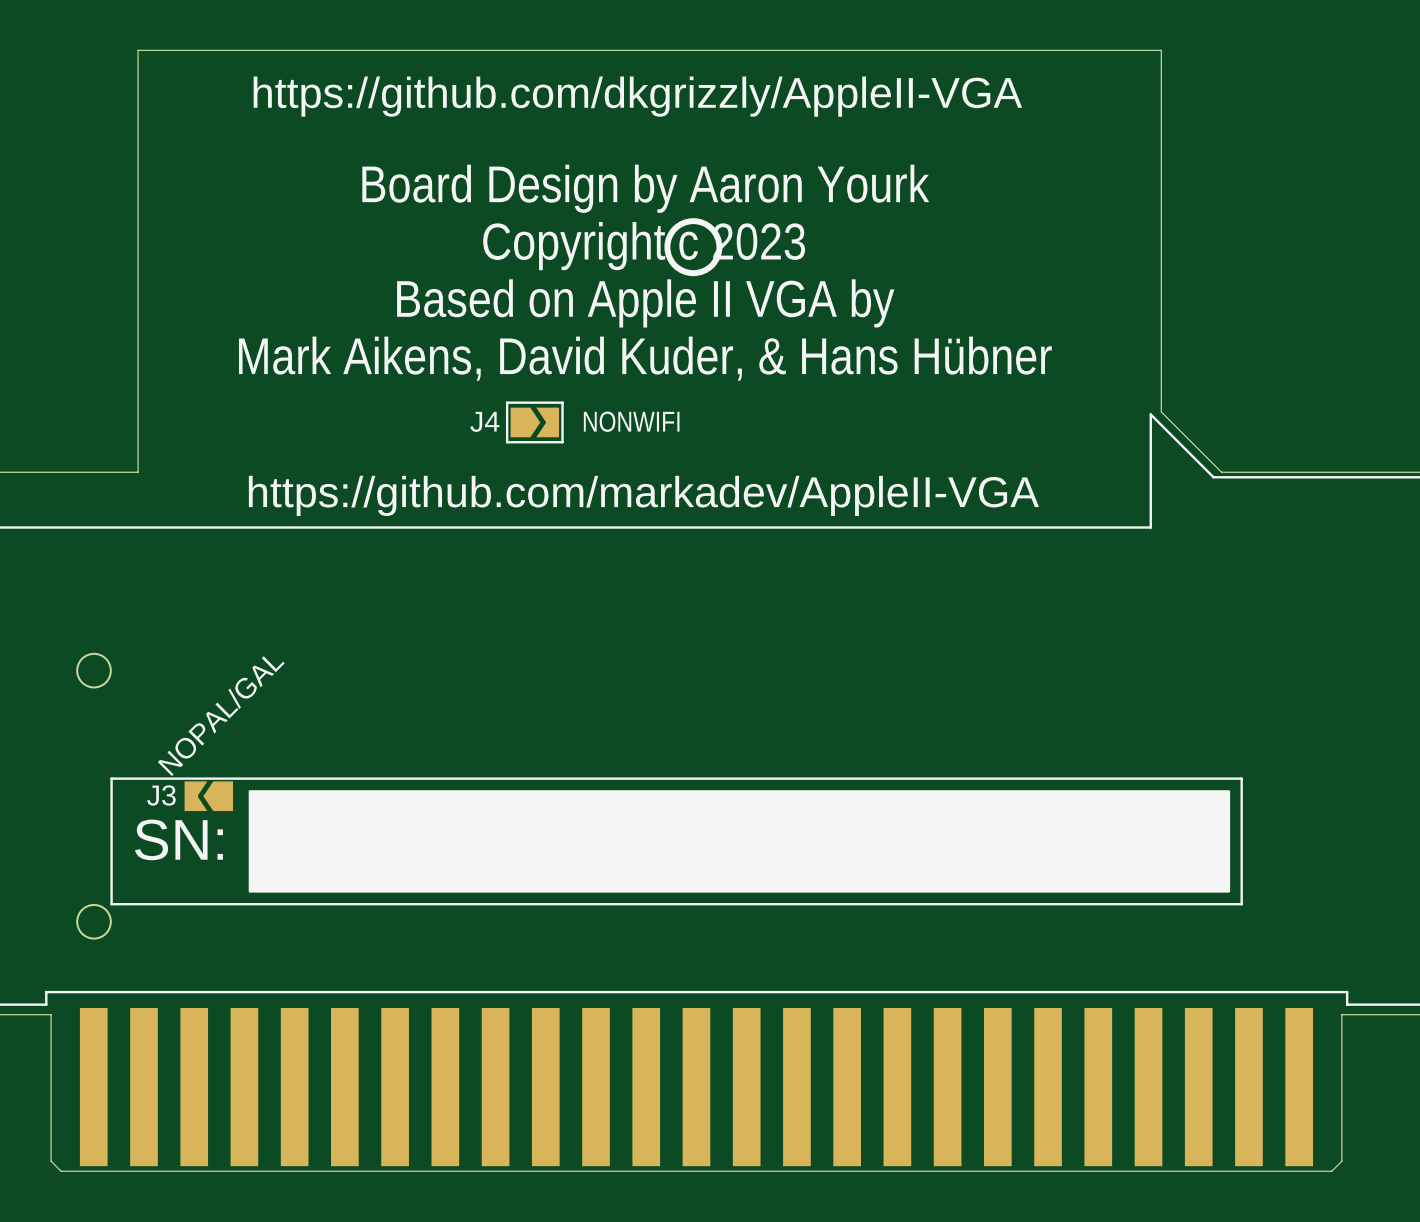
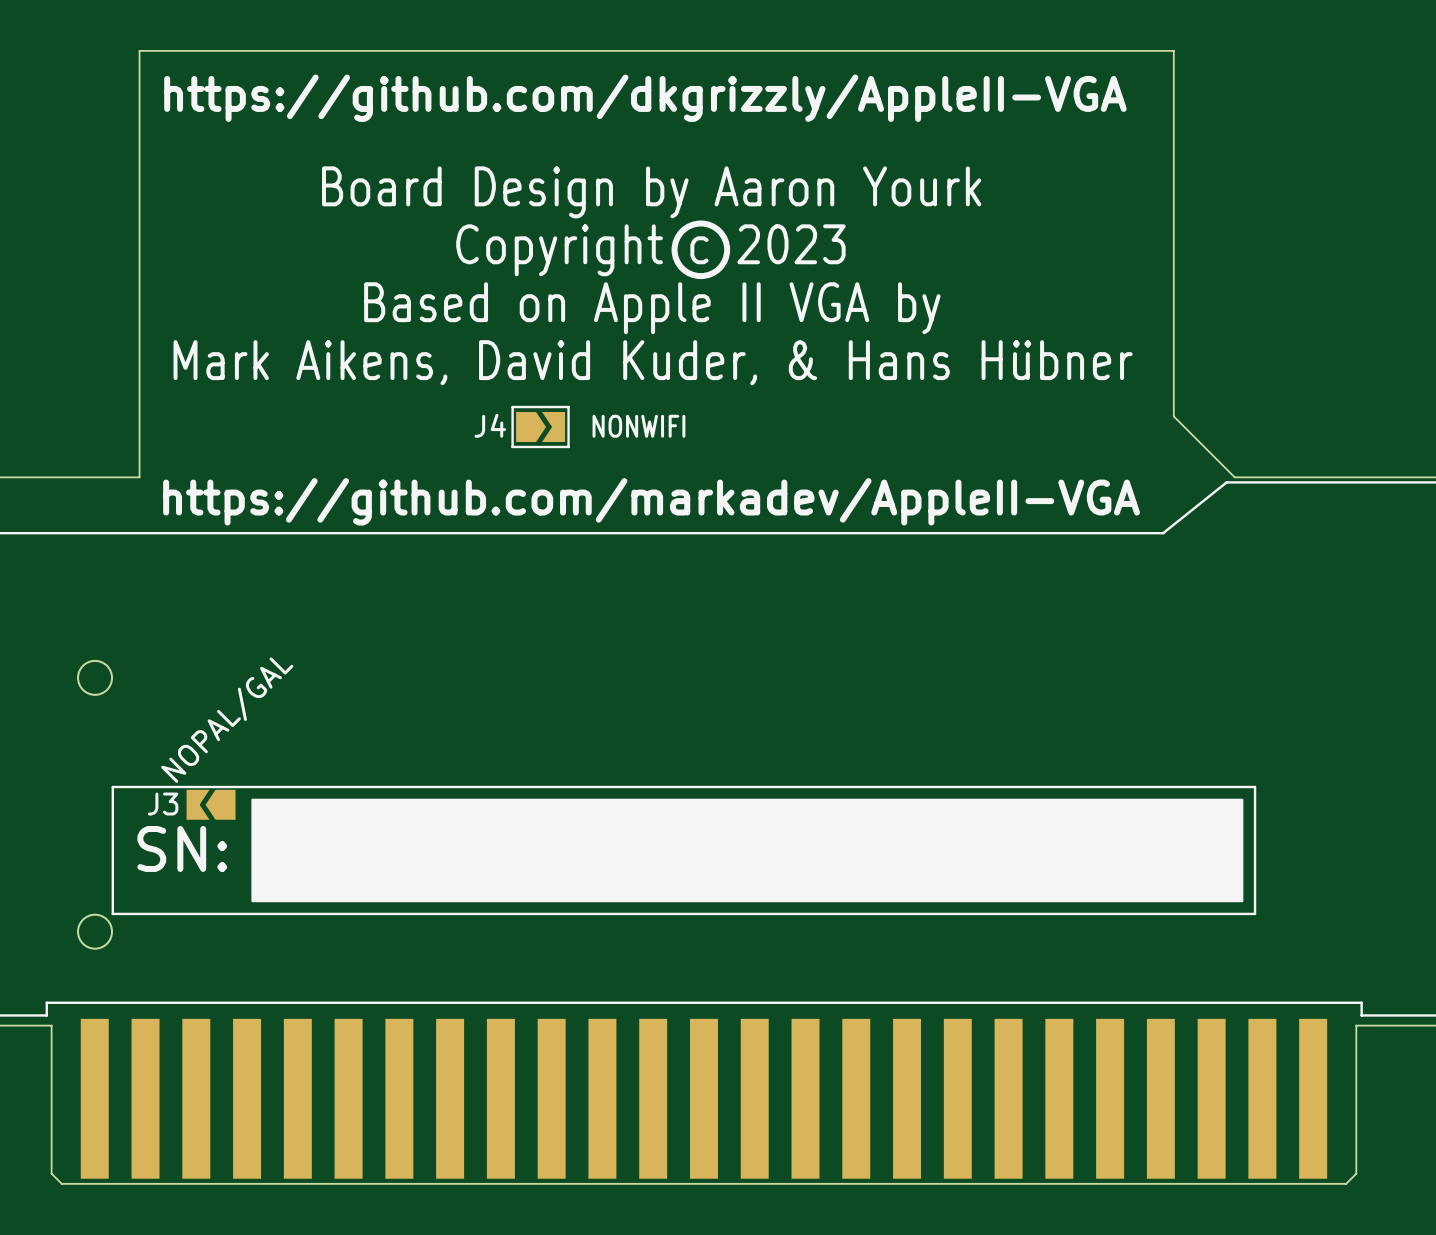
line: (1213, 477) (1150, 414) (1150, 527) -> (1226, 482) (1163, 533)

